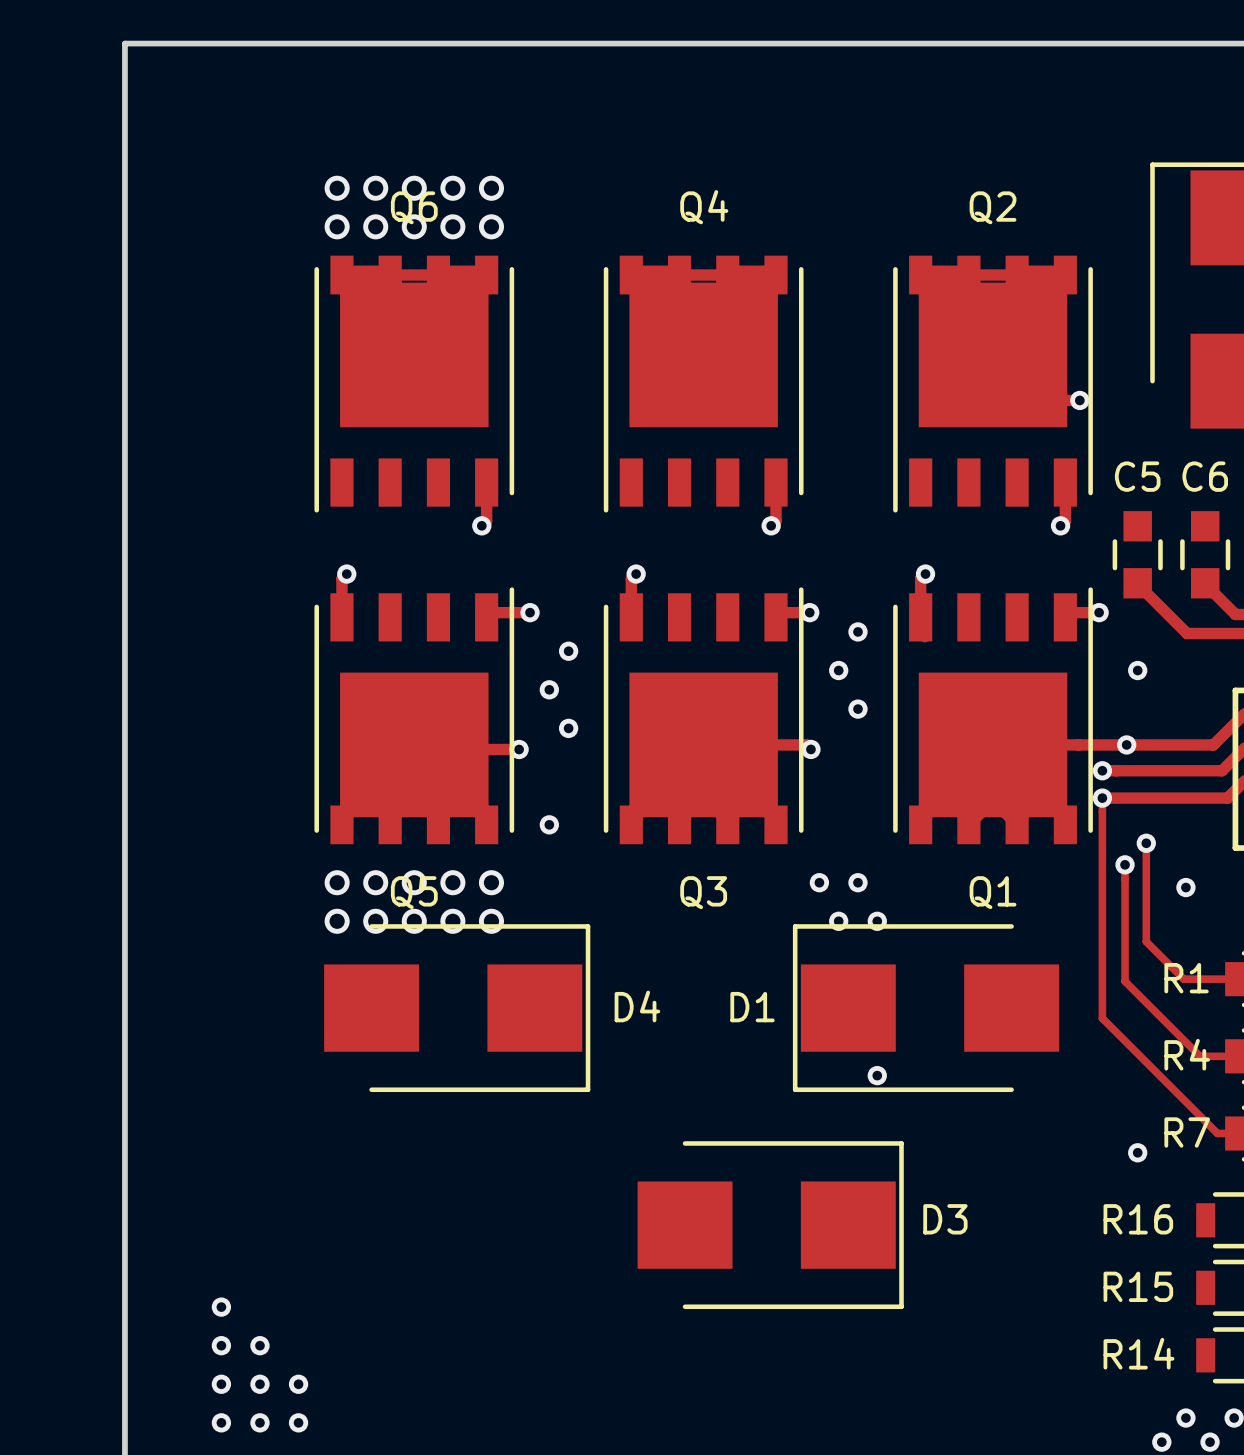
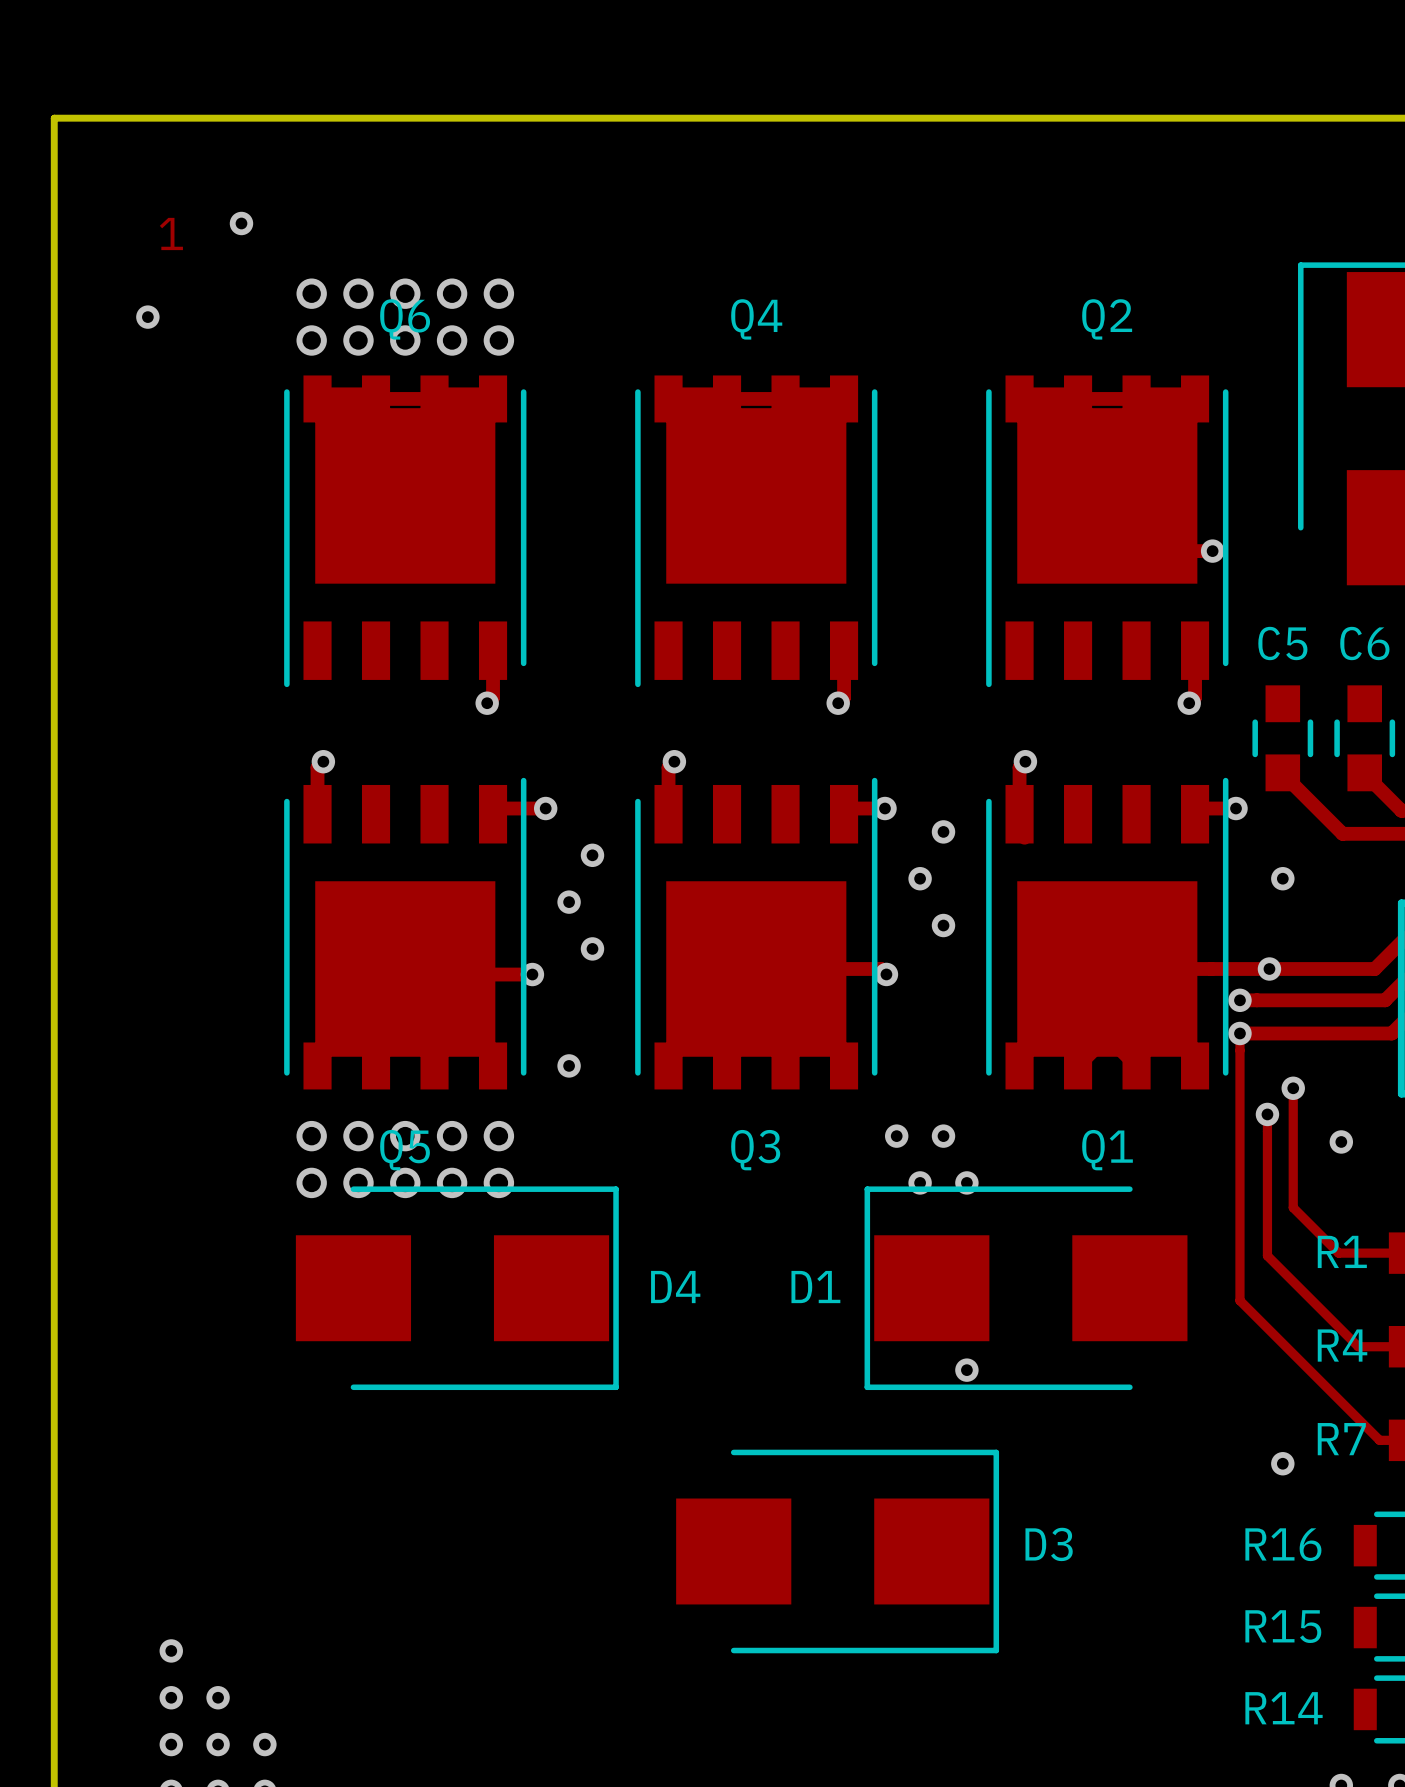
via: none -> (241, 223)
text: none -> 1 (171, 233)
via: none -> (147, 317)

